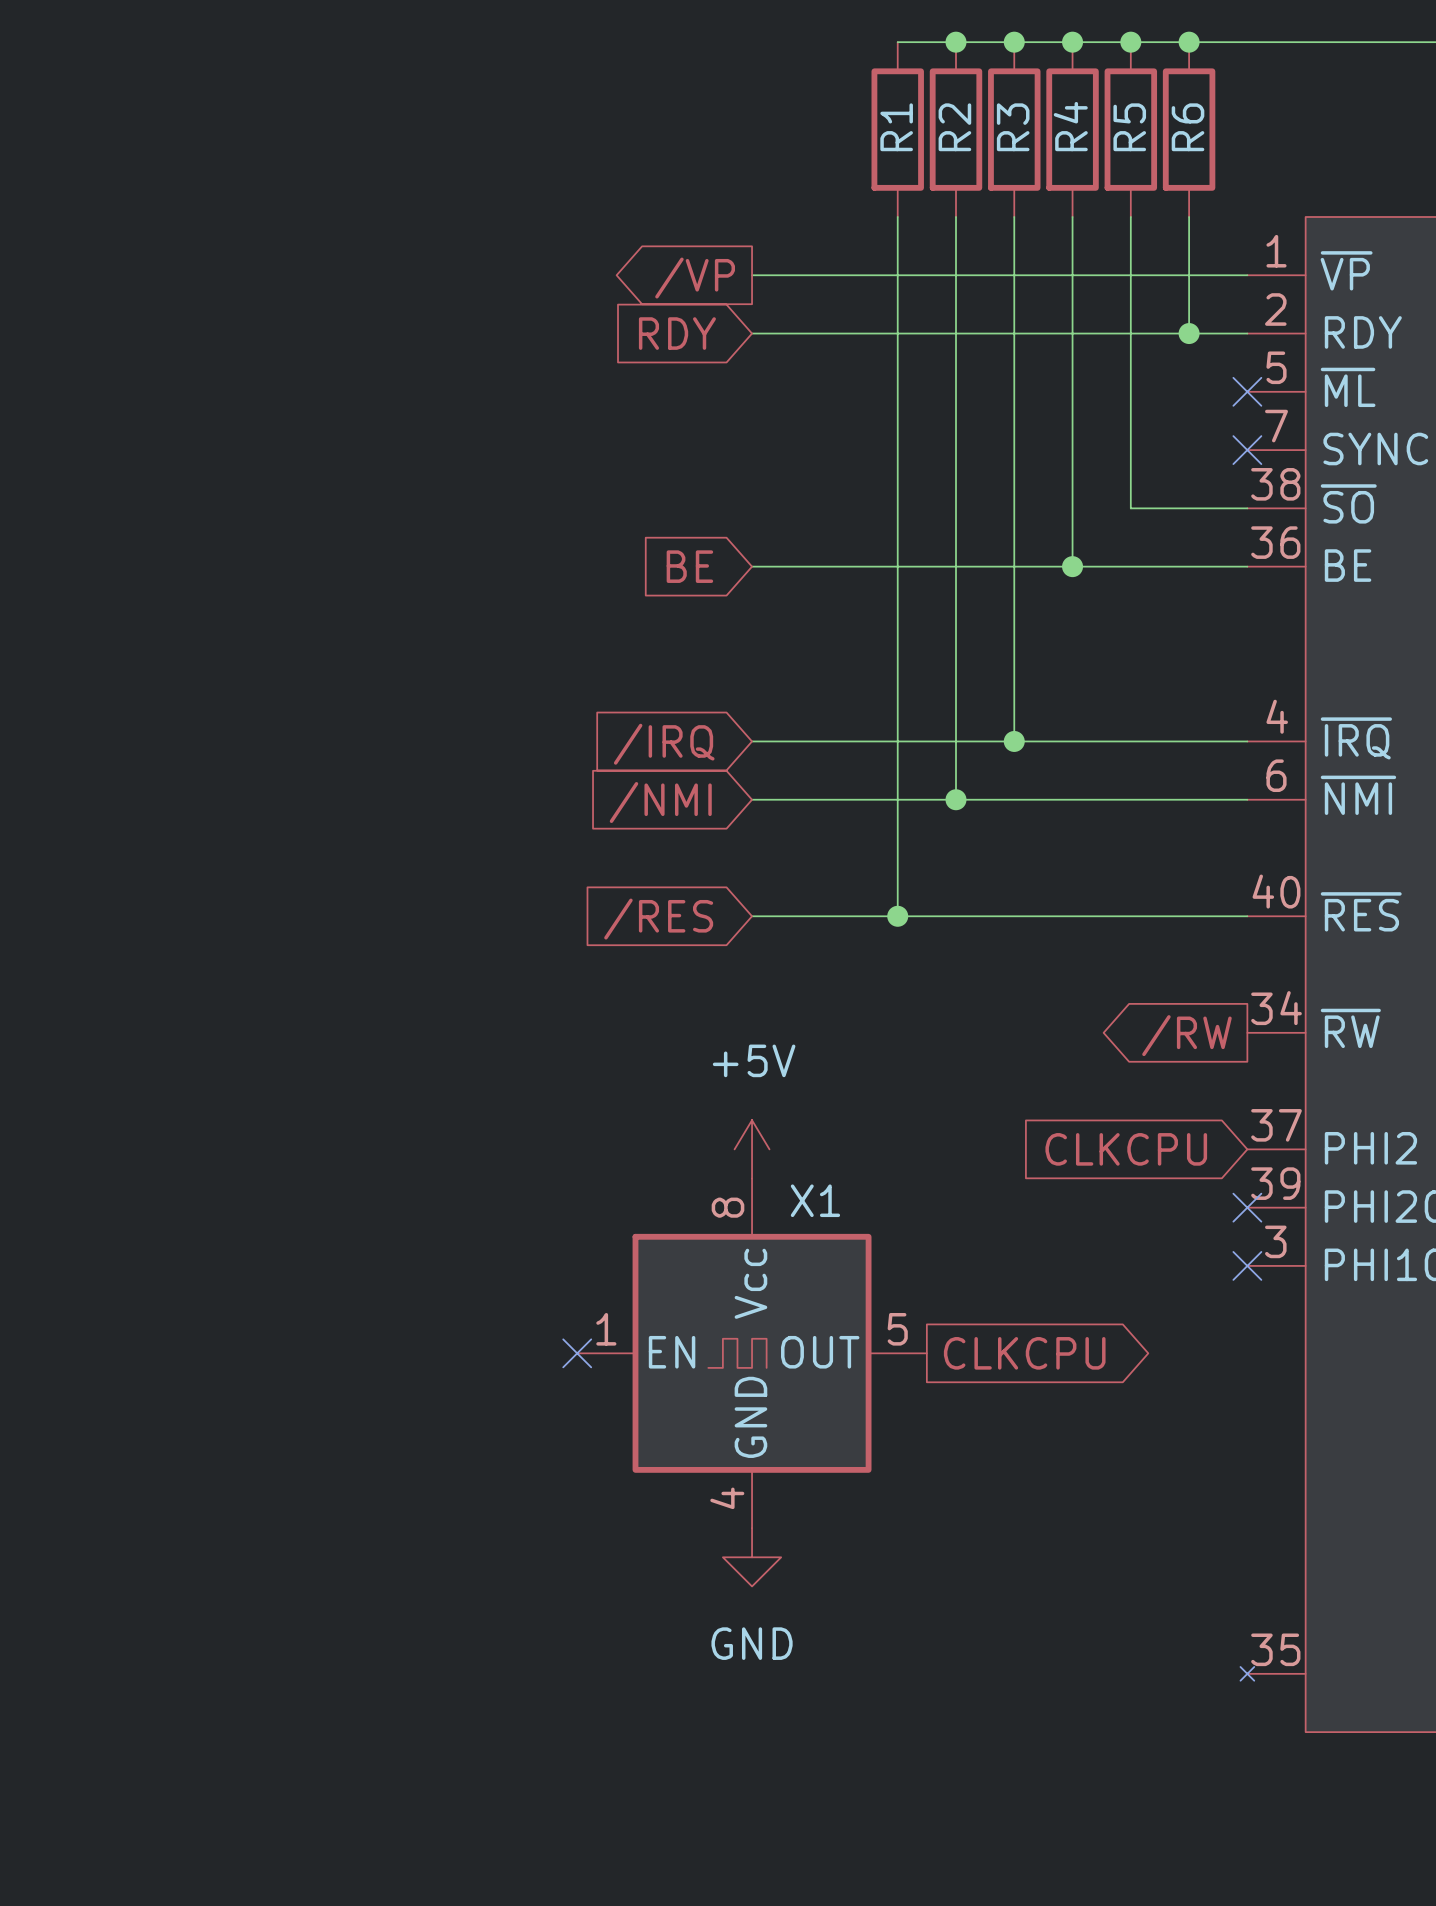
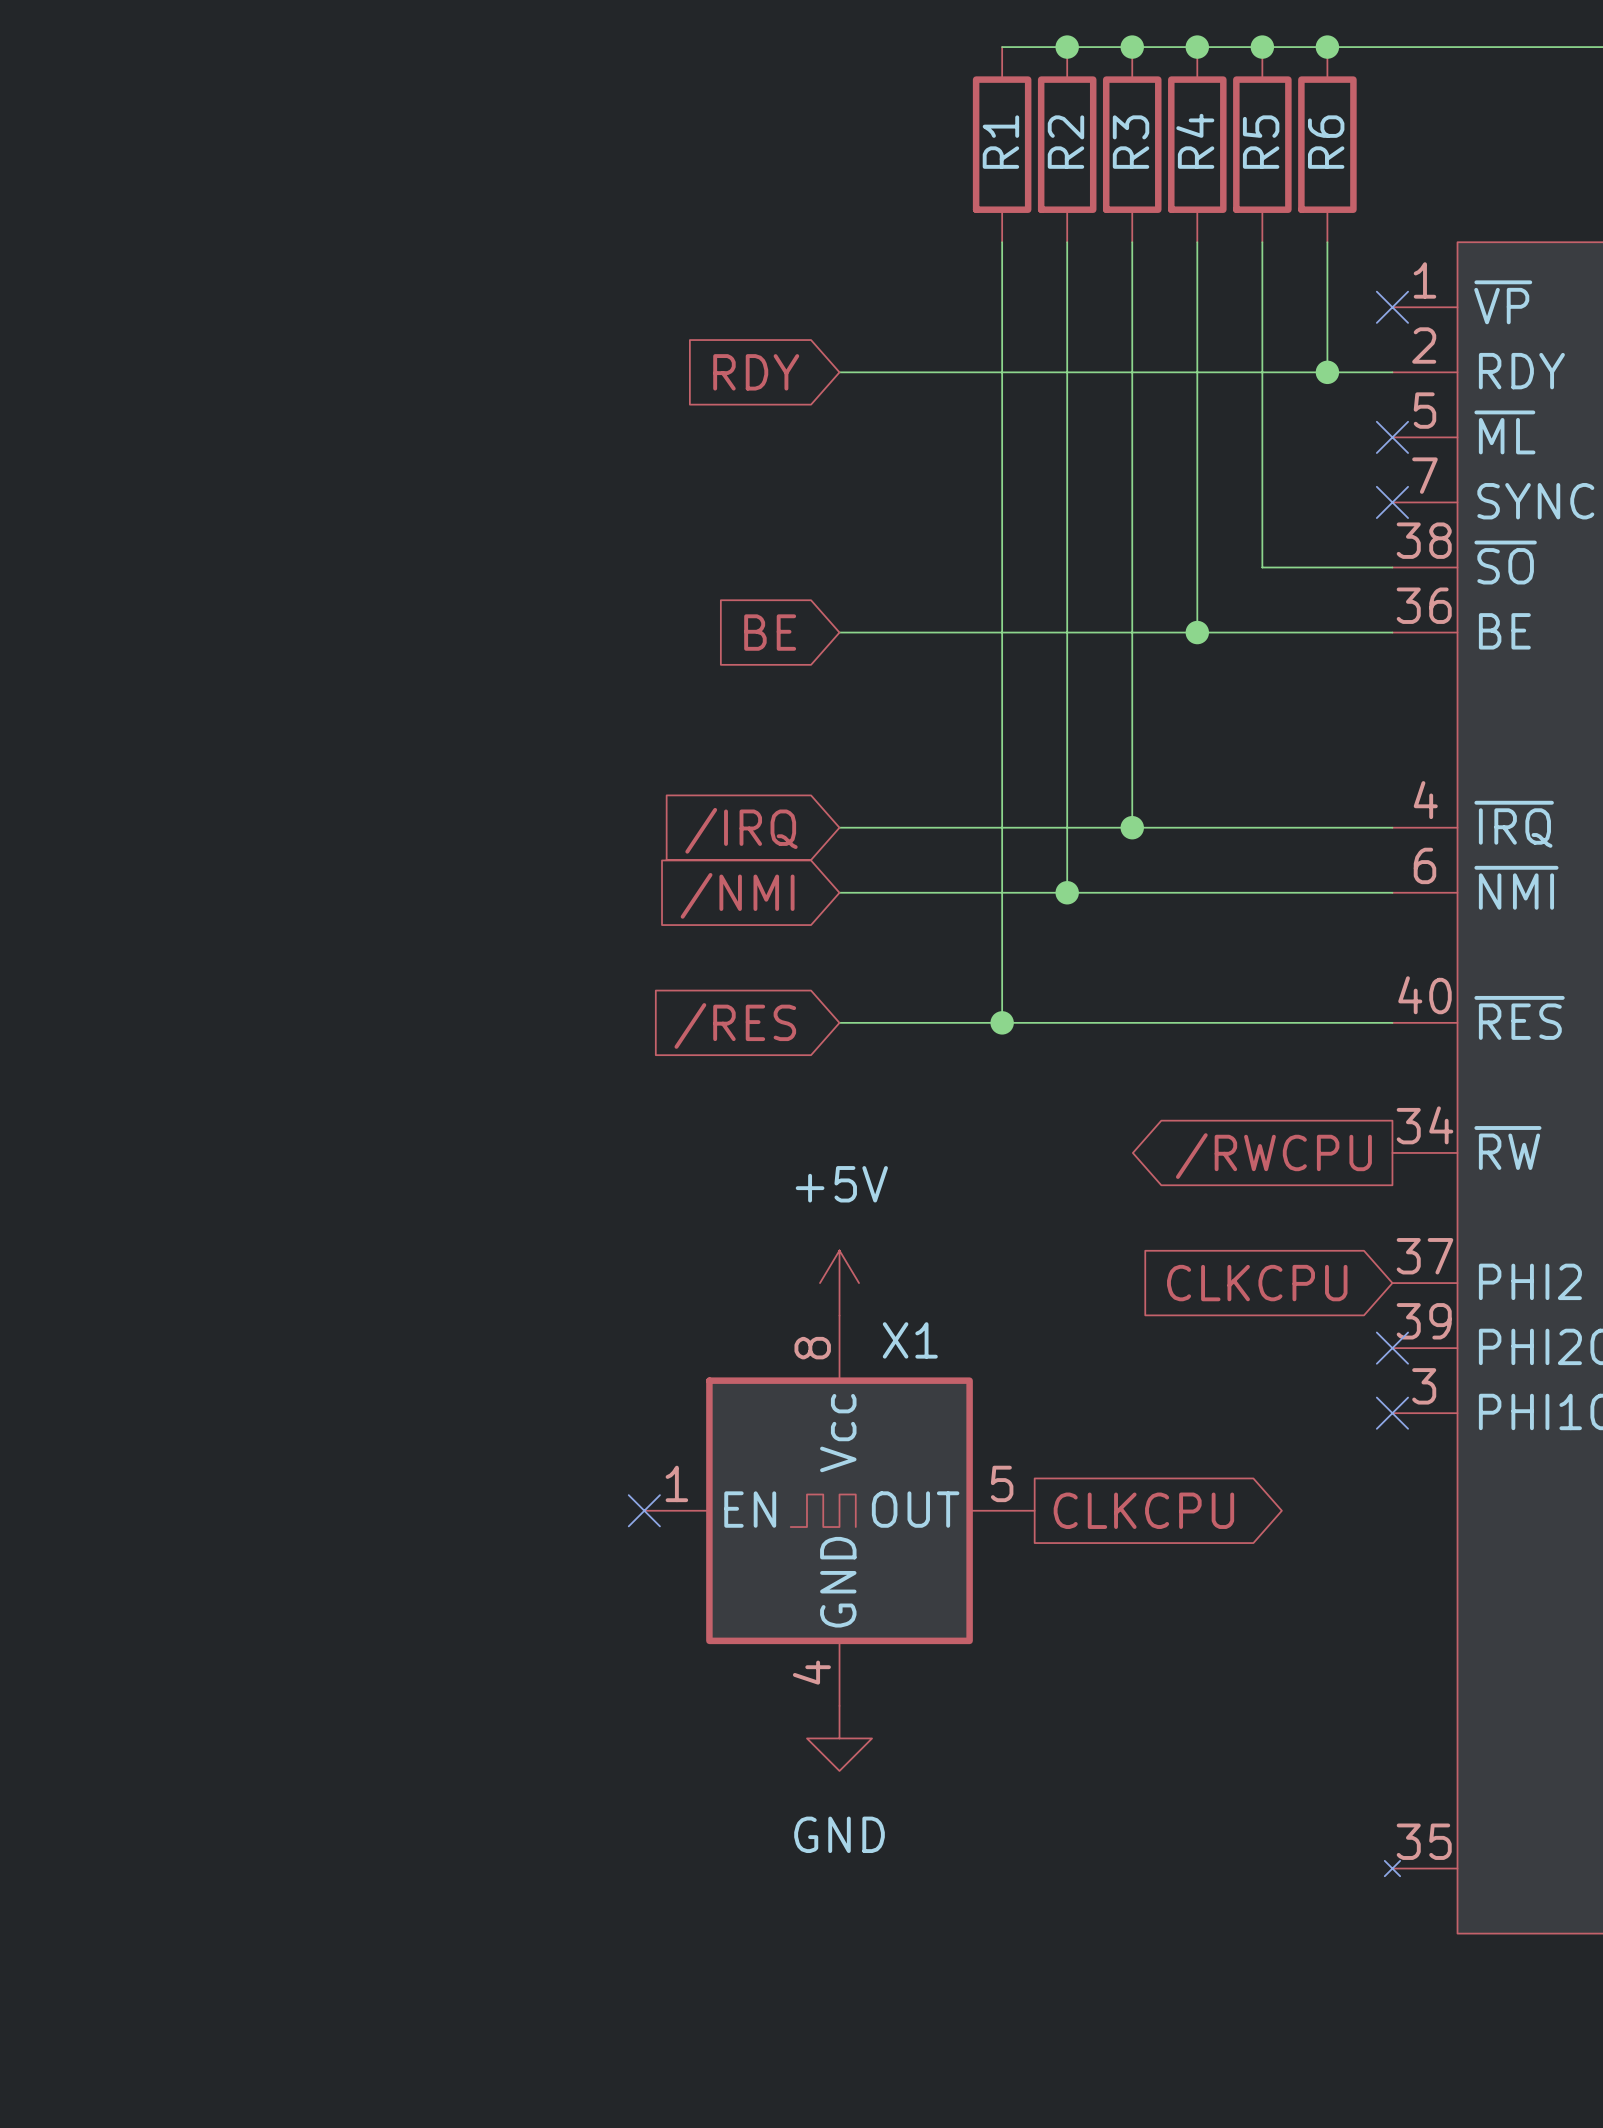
wire: (752, 275) (1247, 275) -> none
no-connect mark: none -> (1392, 307)
global label: /VP (695, 278) -> none
global label: /RW (1186, 1035) -> /RWCPU (1273, 1156)

